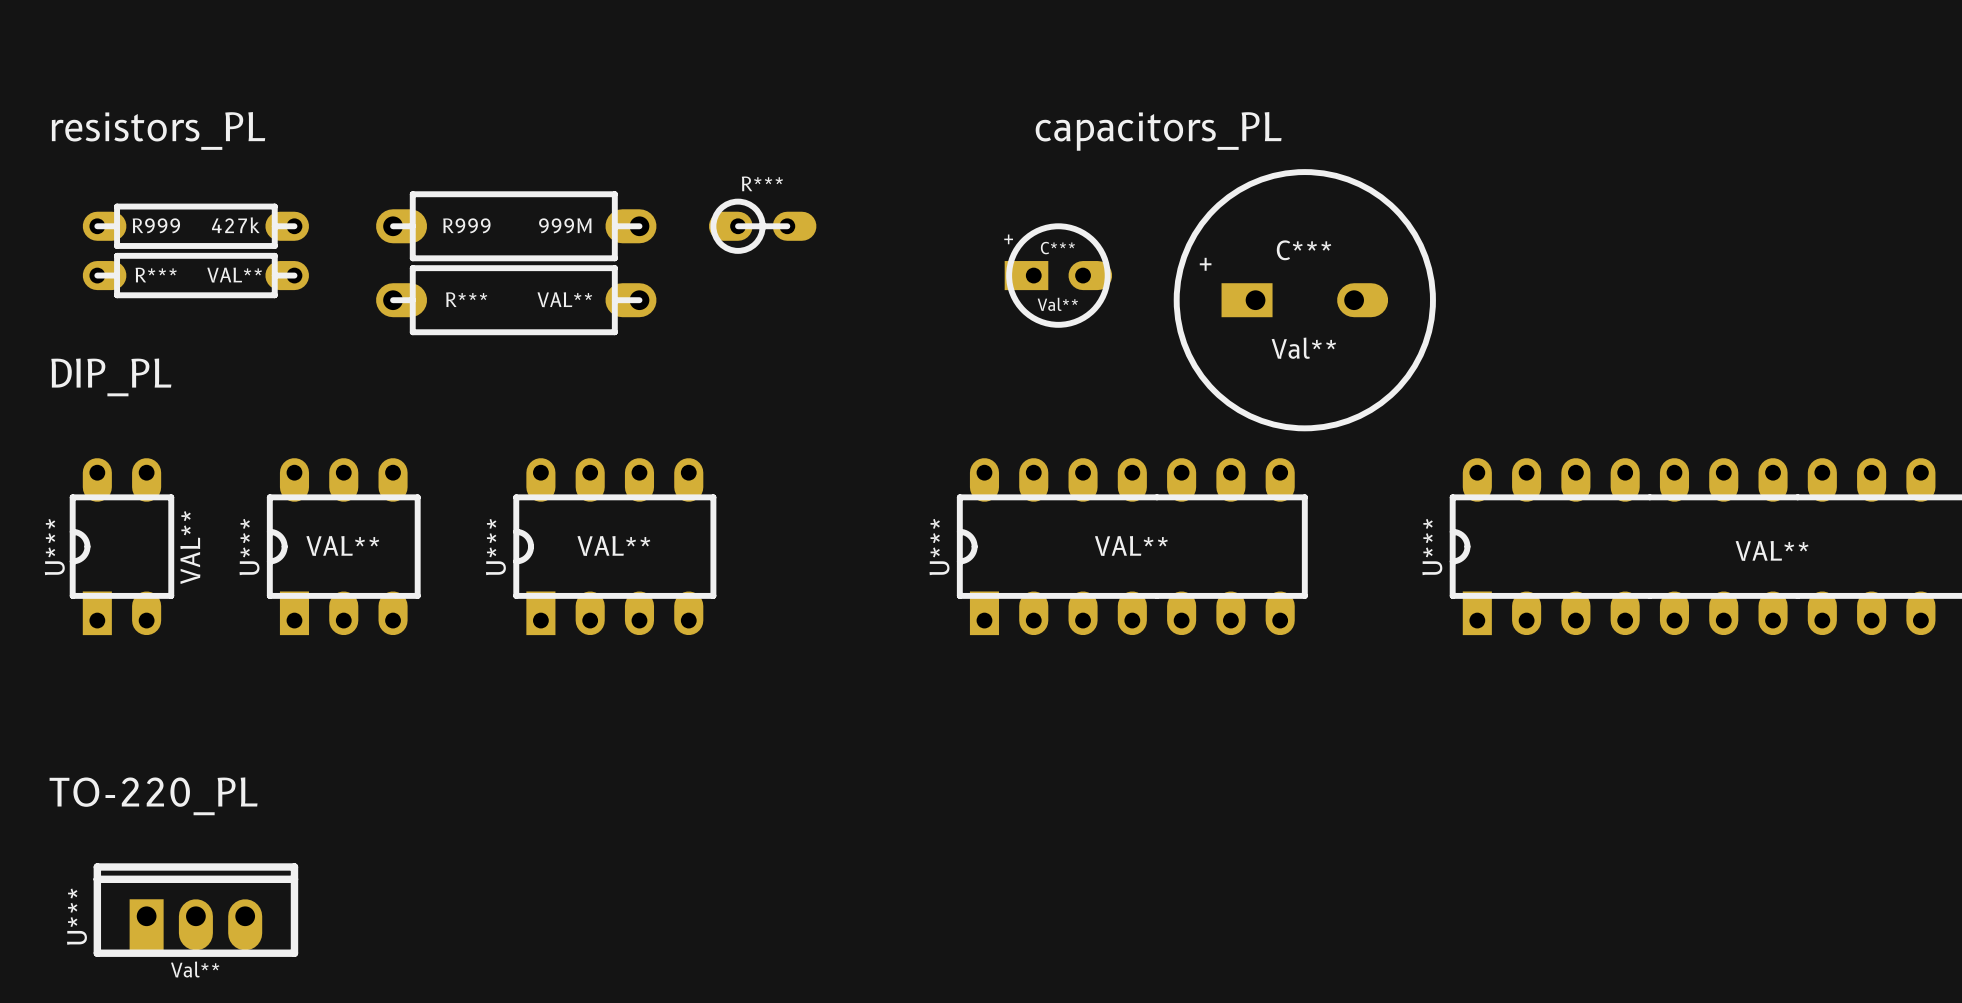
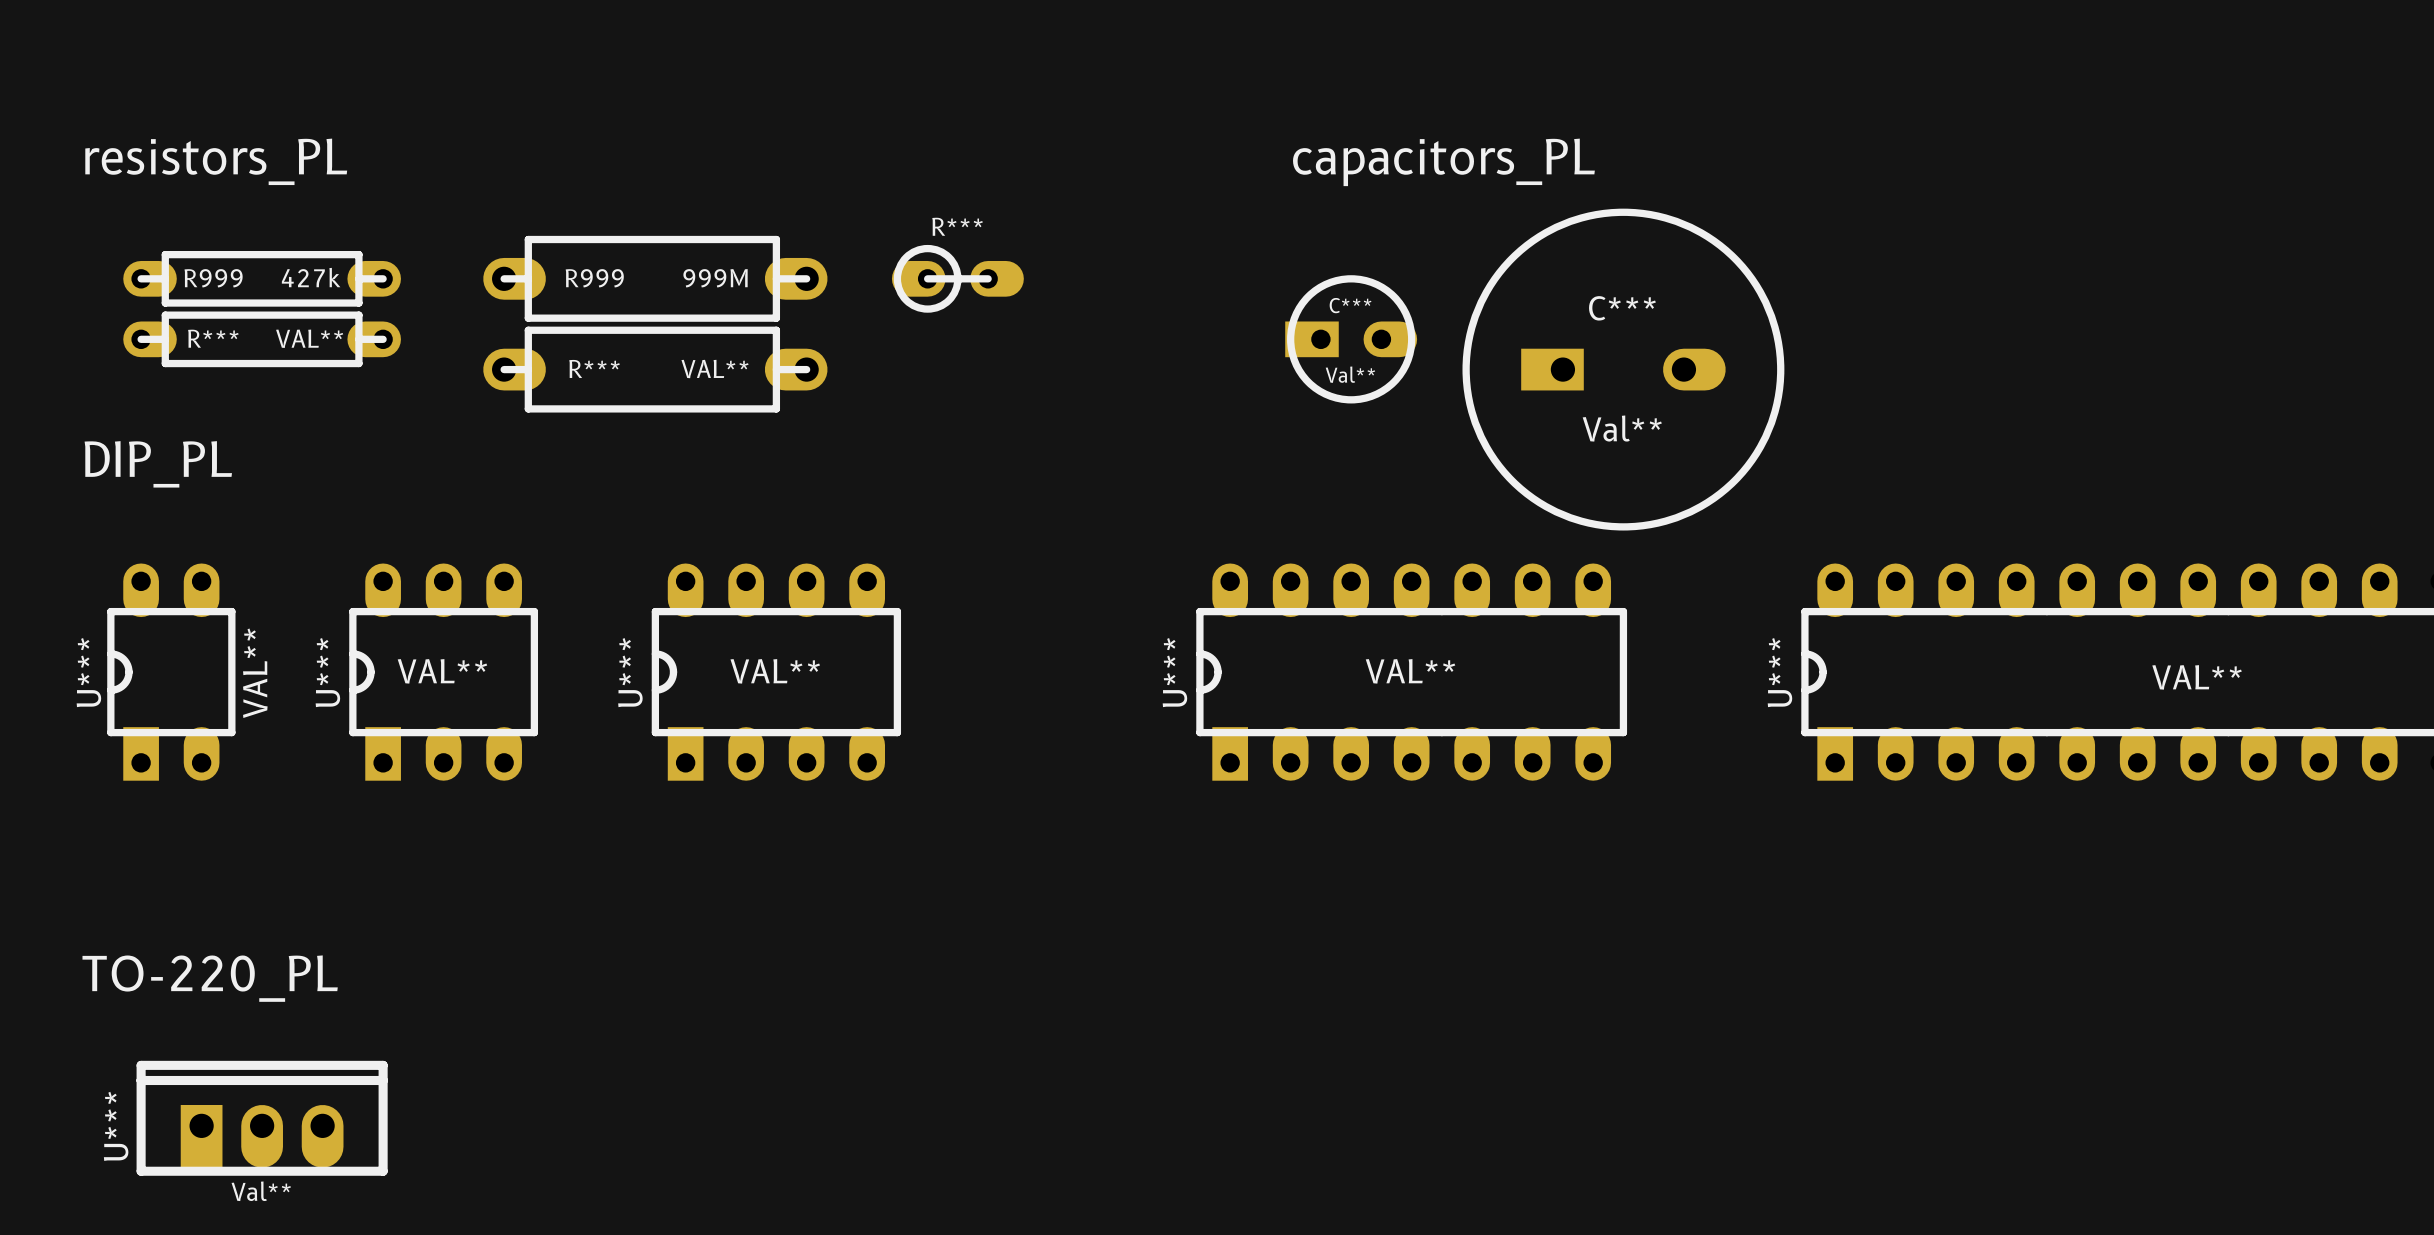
C*** text: + (1205, 264) -> none
C***: Val** (1058, 275) -> none
C***: none -> Val** (1351, 339)

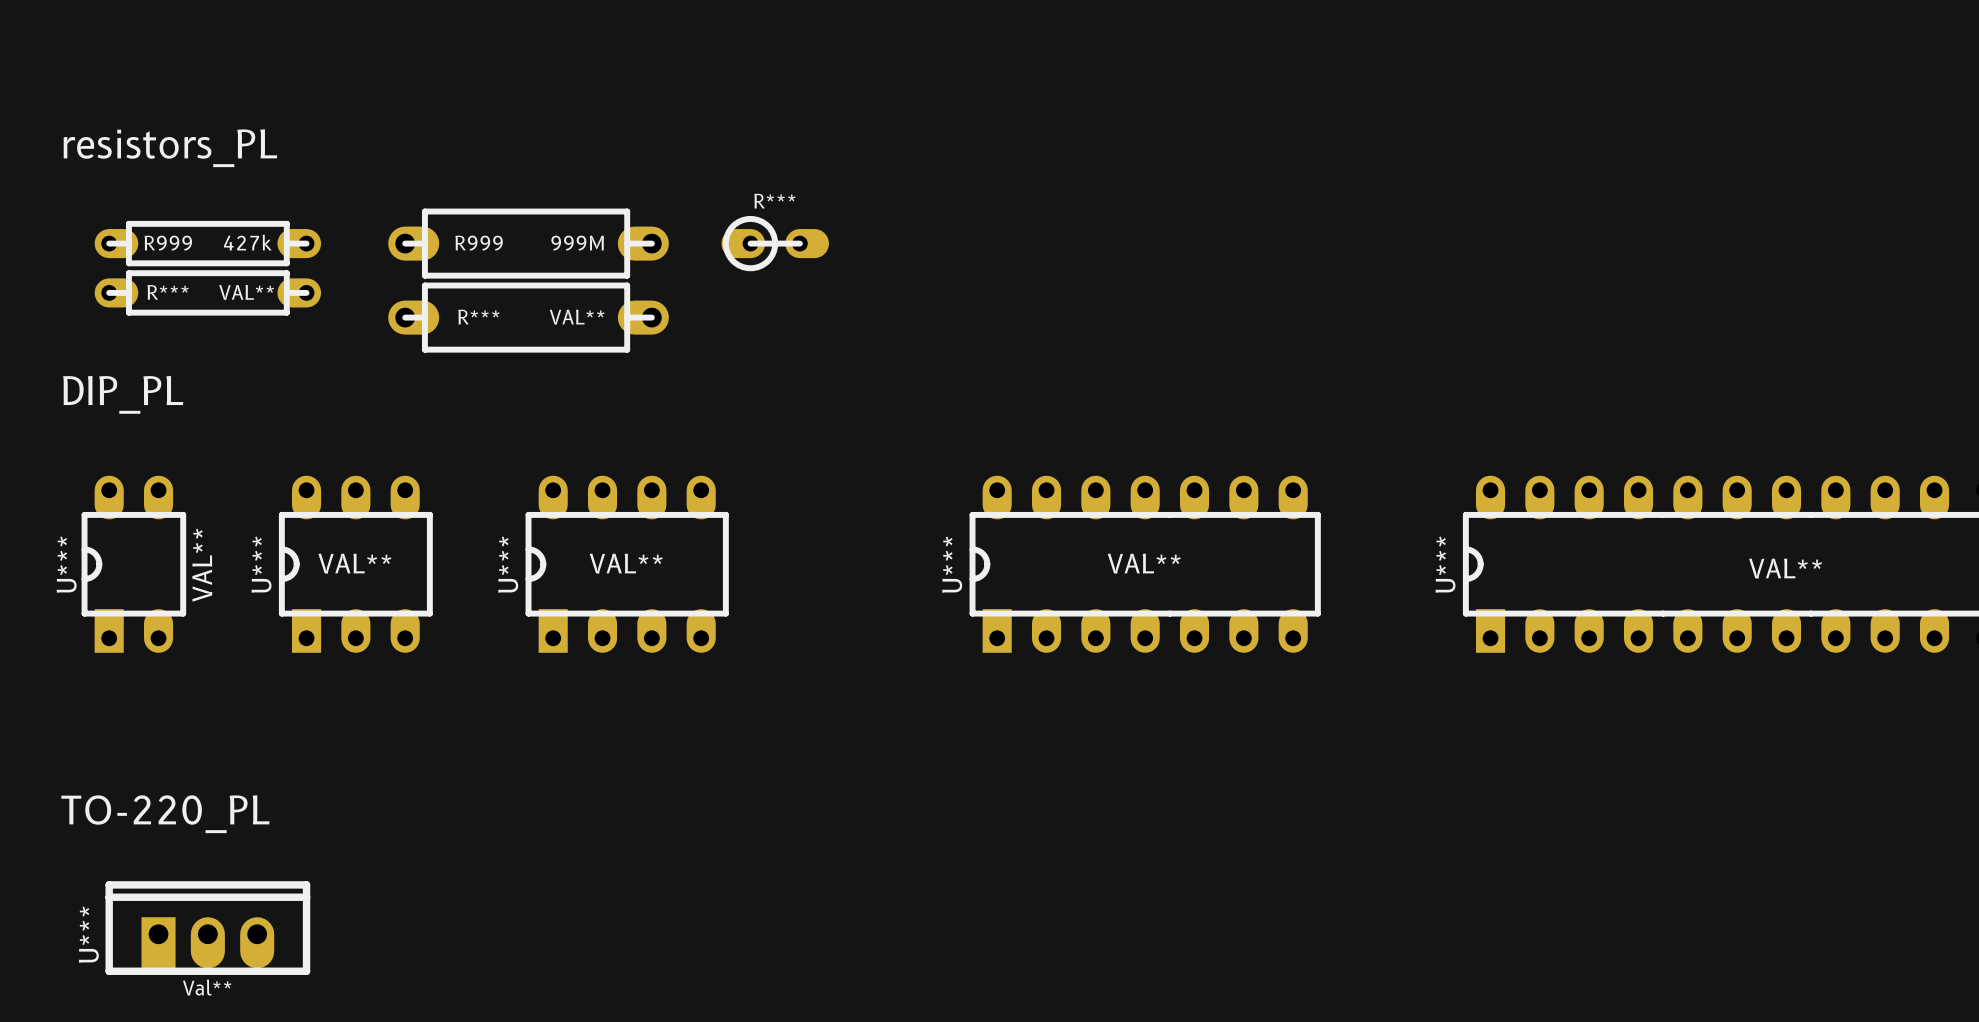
text: capacitors_PL (1443, 162) -> none
C***: Val** (1351, 339) -> none
C***: Val** (1623, 369) -> none

